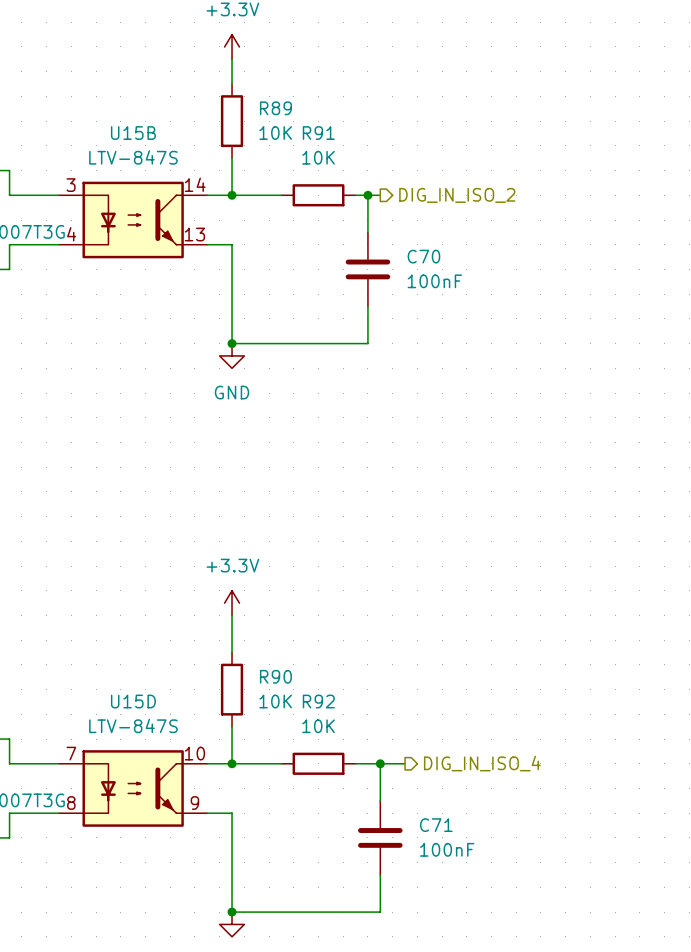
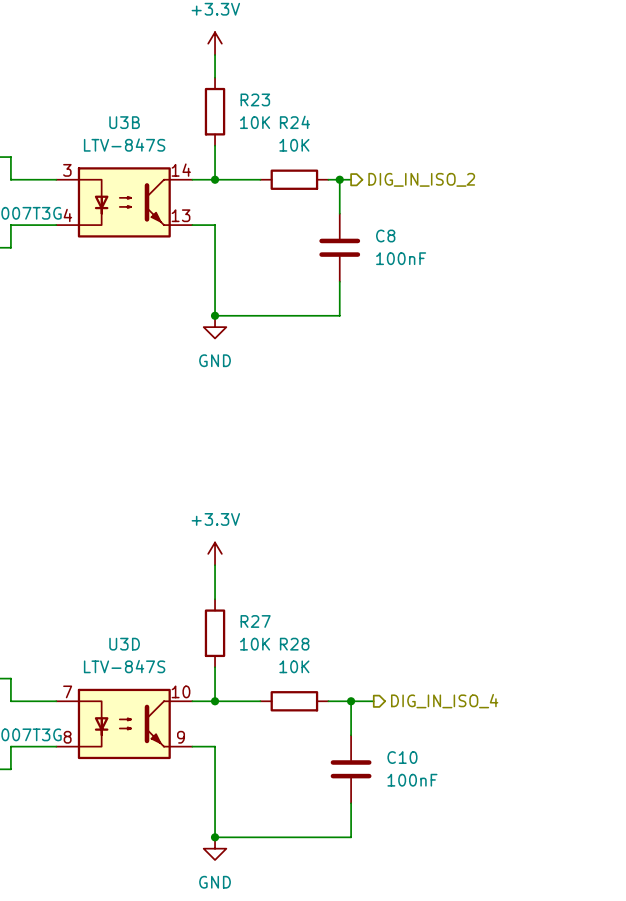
R89 name: R89 (275, 108) -> R23 (255, 99)
U15B name: U15B (133, 133) -> U3B (124, 122)
R91 name: R91 (318, 133) -> R24 (294, 122)
C70 name: C70 (423, 256) -> C8 (385, 235)
R90 name: R90 (275, 676) -> R27 (255, 621)
U15D name: U15D (133, 701) -> U3D (124, 644)
R92 name: R92 (318, 701) -> R28 (294, 644)
C71 name: C71 (436, 825) -> C10 (402, 757)

